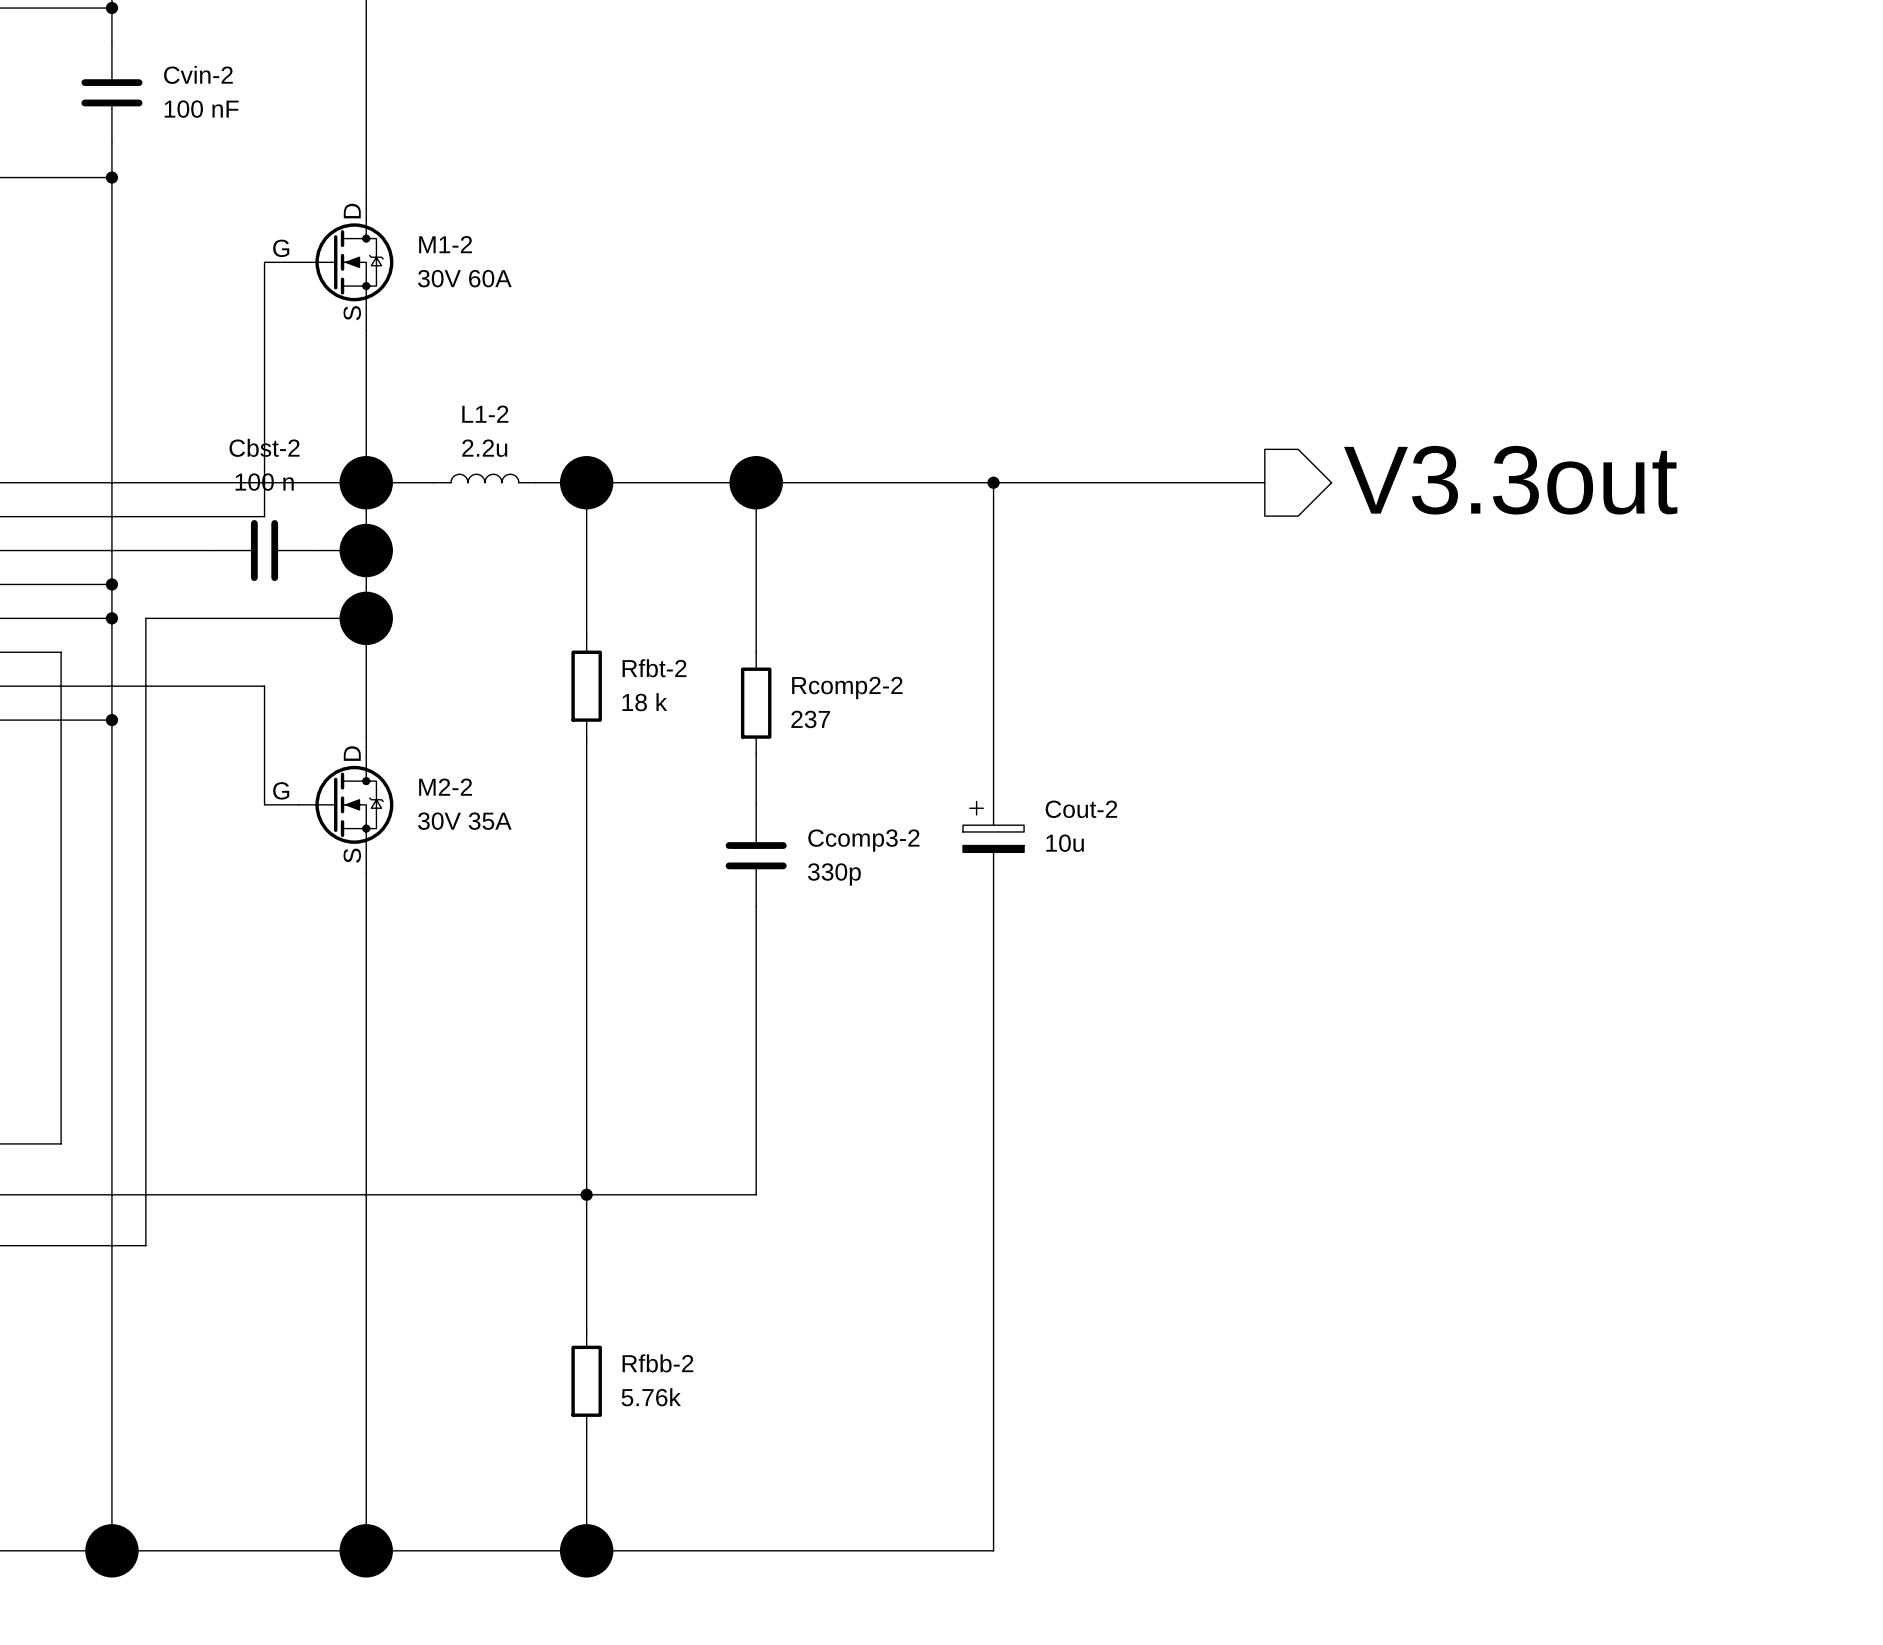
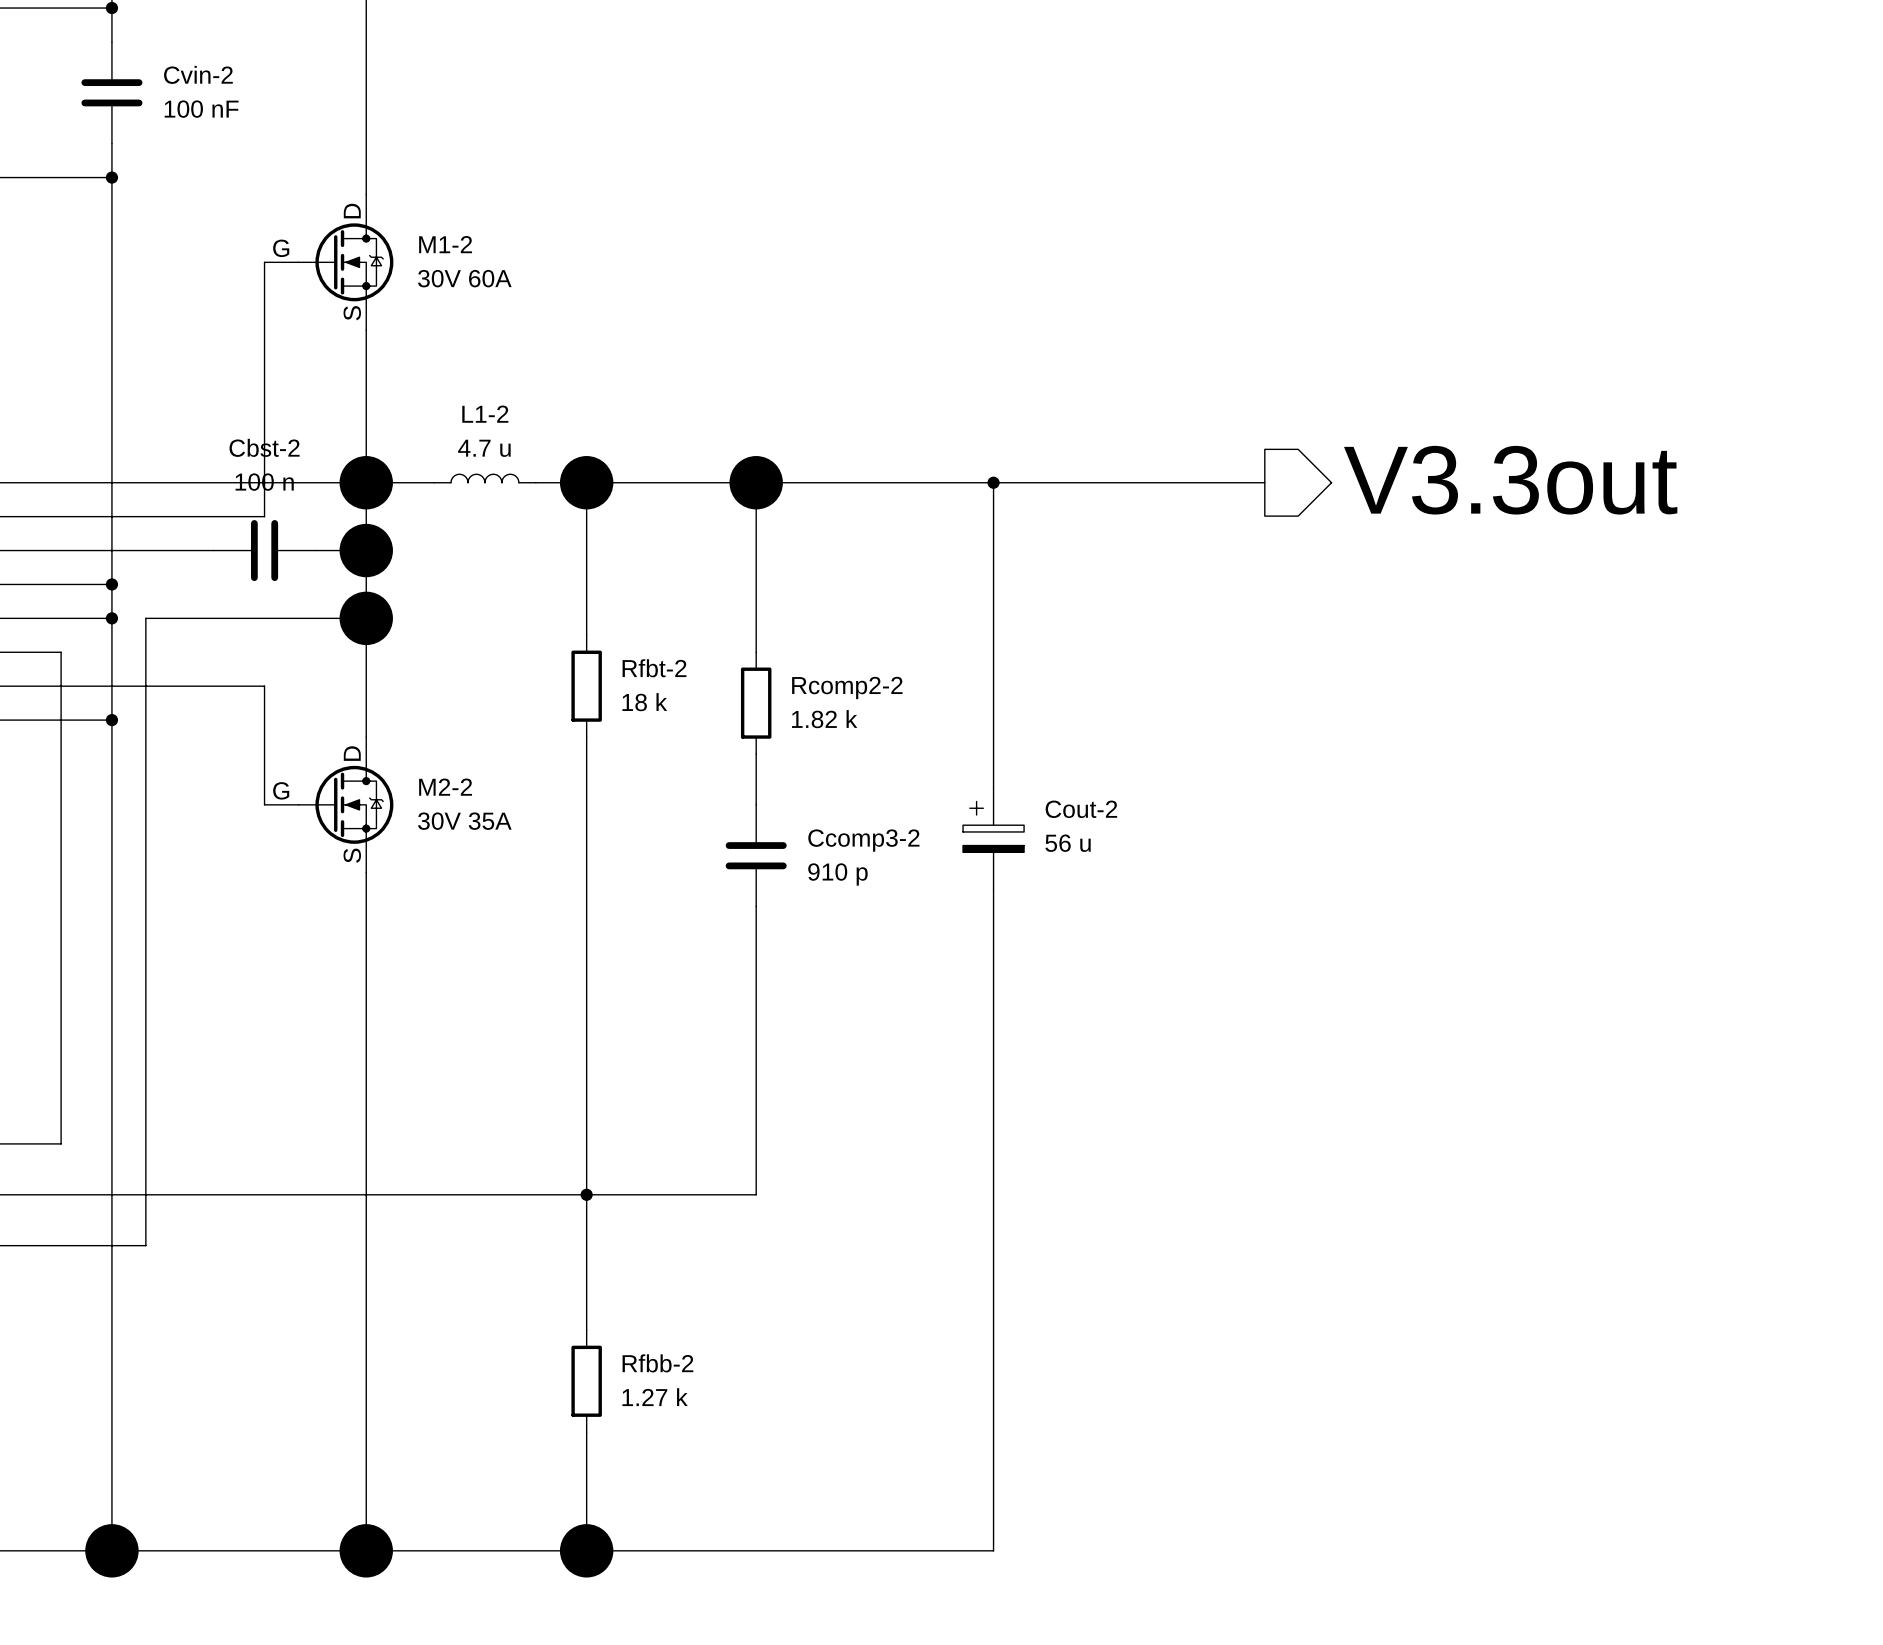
L1-2 value: 2.2u (484, 448) -> 4.7 u (484, 448)
Rcomp2-2 value: 237 (810, 719) -> 1.82 k (824, 719)
Cout-2 value: 10u (1065, 843) -> 56 u (1068, 843)
Ccomp3-2 value: 330p (834, 874) -> 910 p (837, 874)
Rfbb-2 value: 5.76k (651, 1397) -> 1.27 k (655, 1397)

